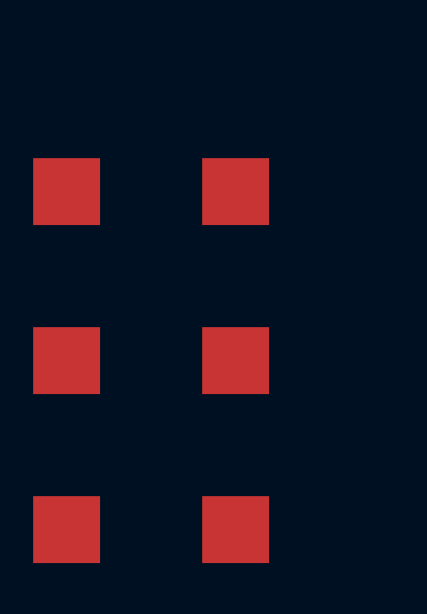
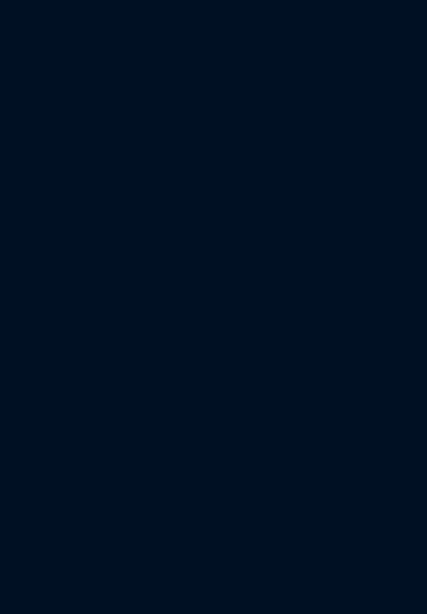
part: (66, 191) -> none
part: (235, 191) -> none
part: (66, 360) -> none
part: (235, 360) -> none
part: (66, 529) -> none
part: (235, 529) -> none

